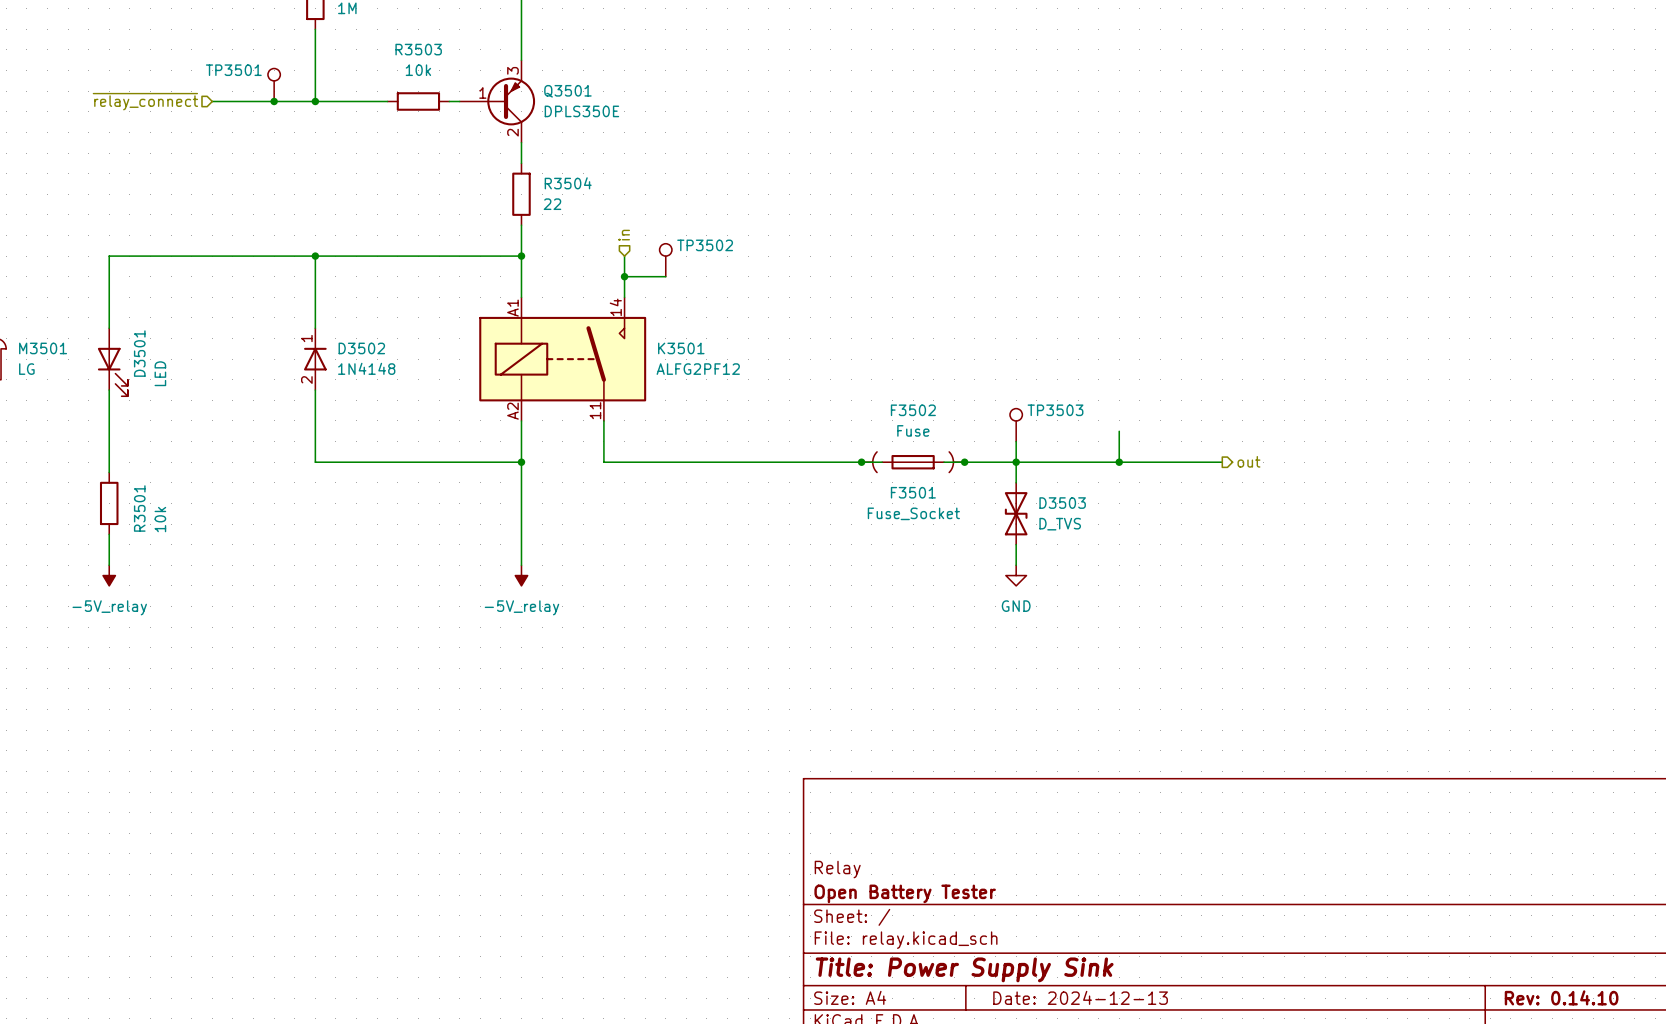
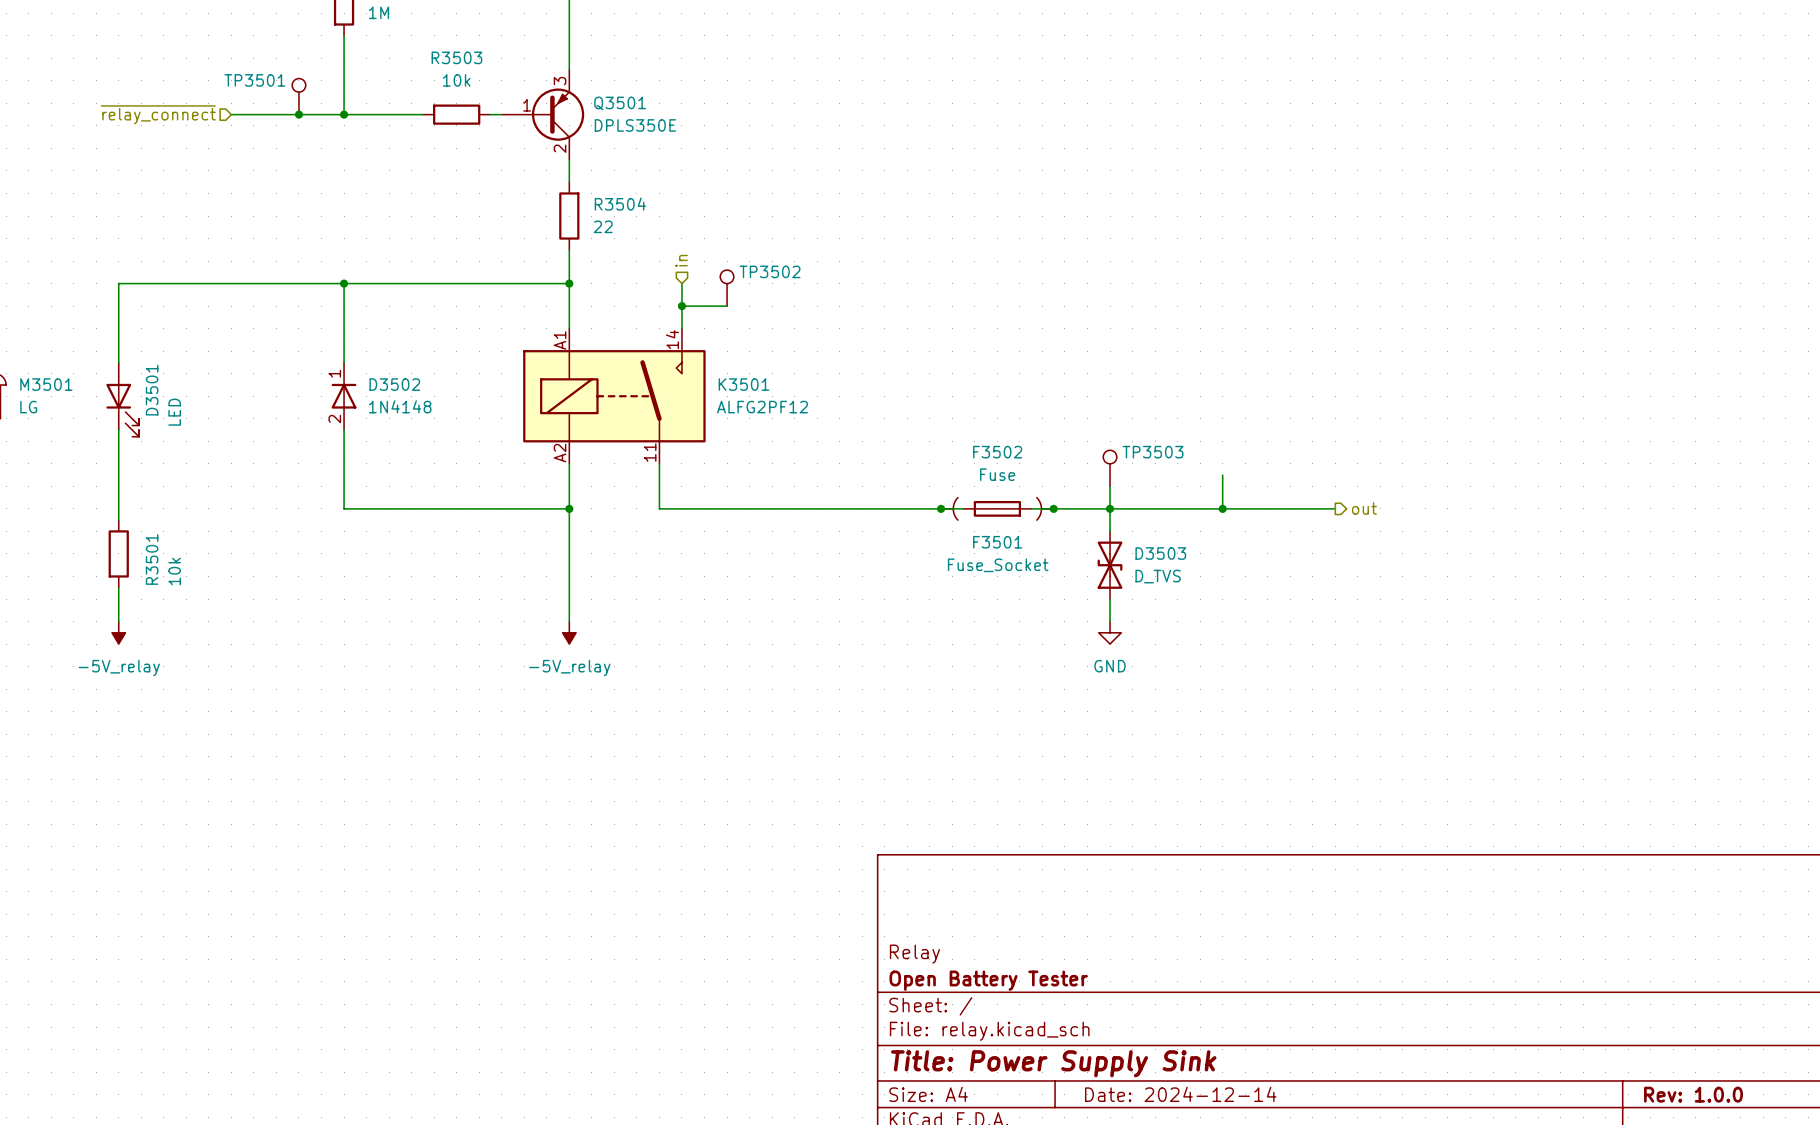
title block: Date: 2024-12-13 (1080, 997) -> Date: 2024-12-14 (1180, 1094)
title block: Rev: 0.14.10 (1561, 997) -> Rev: 1.0.0 (1693, 1094)

